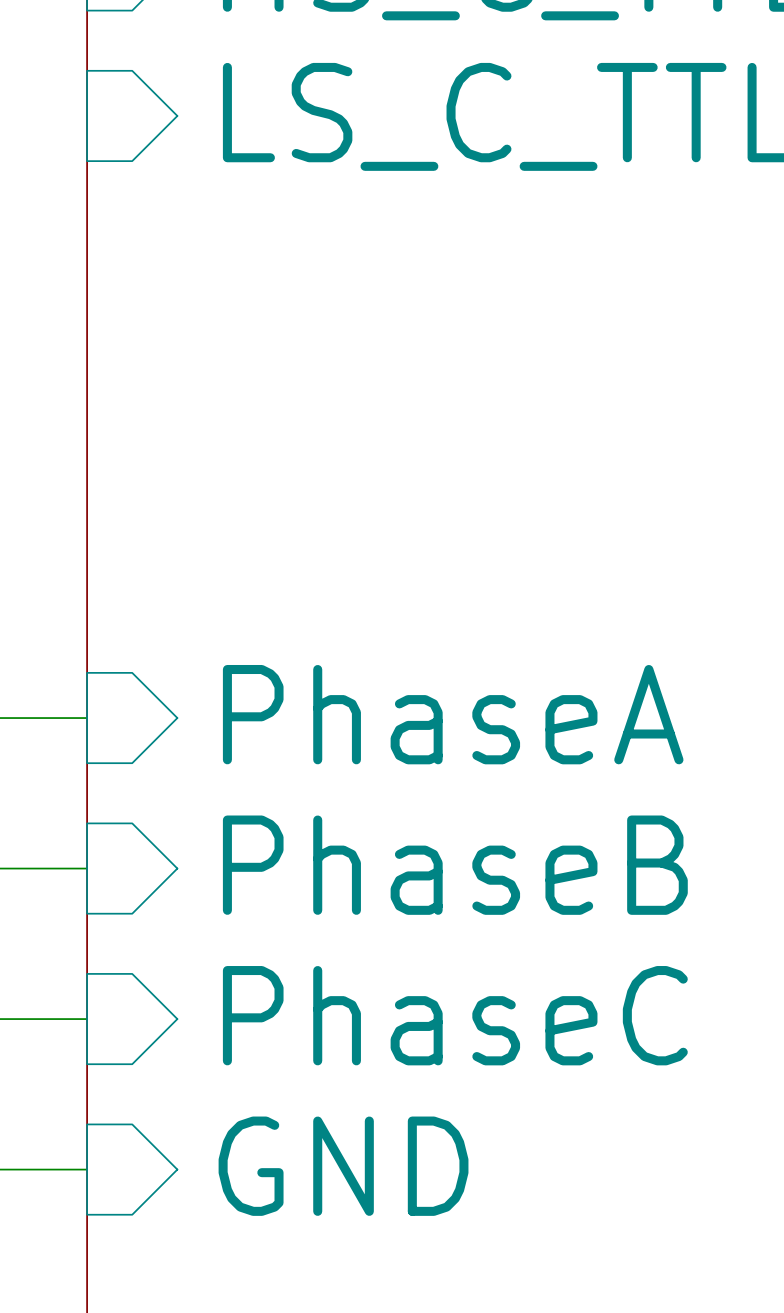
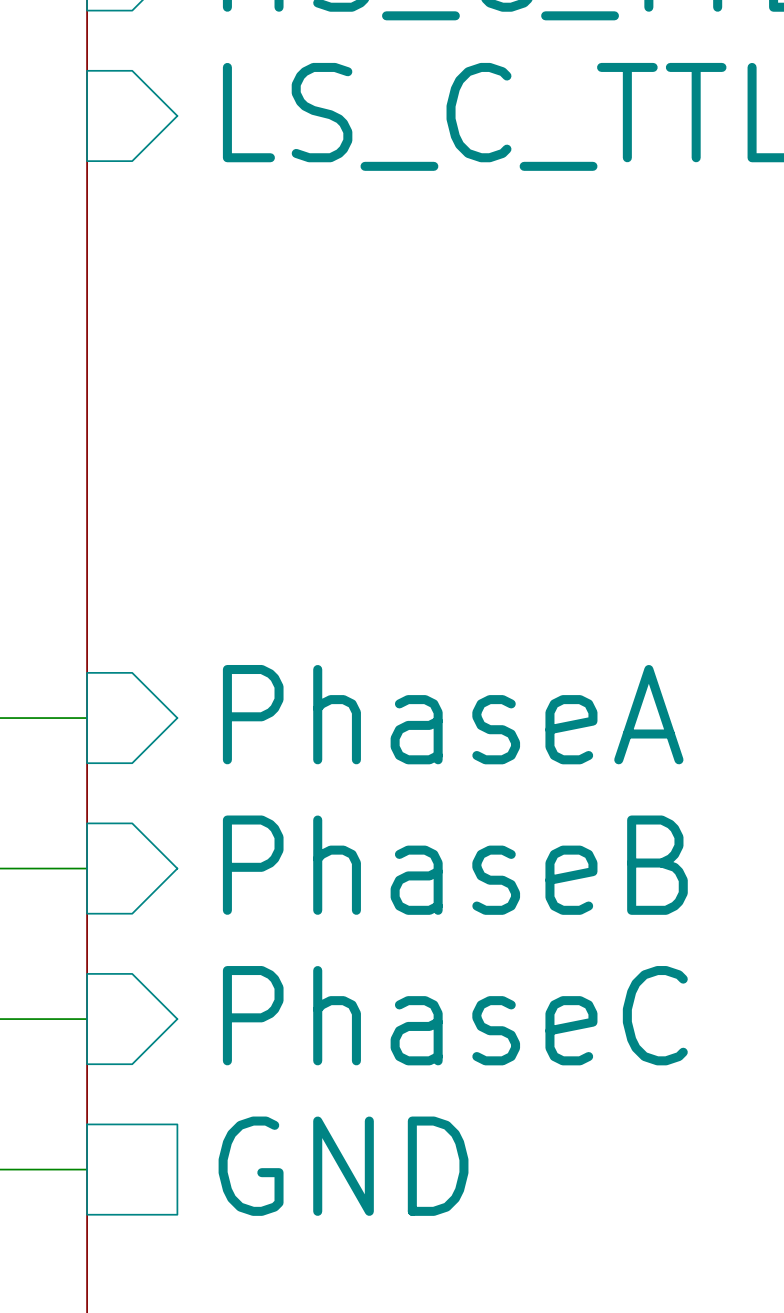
sheet pin shape: input (343, 1166) -> passive (343, 1166)

